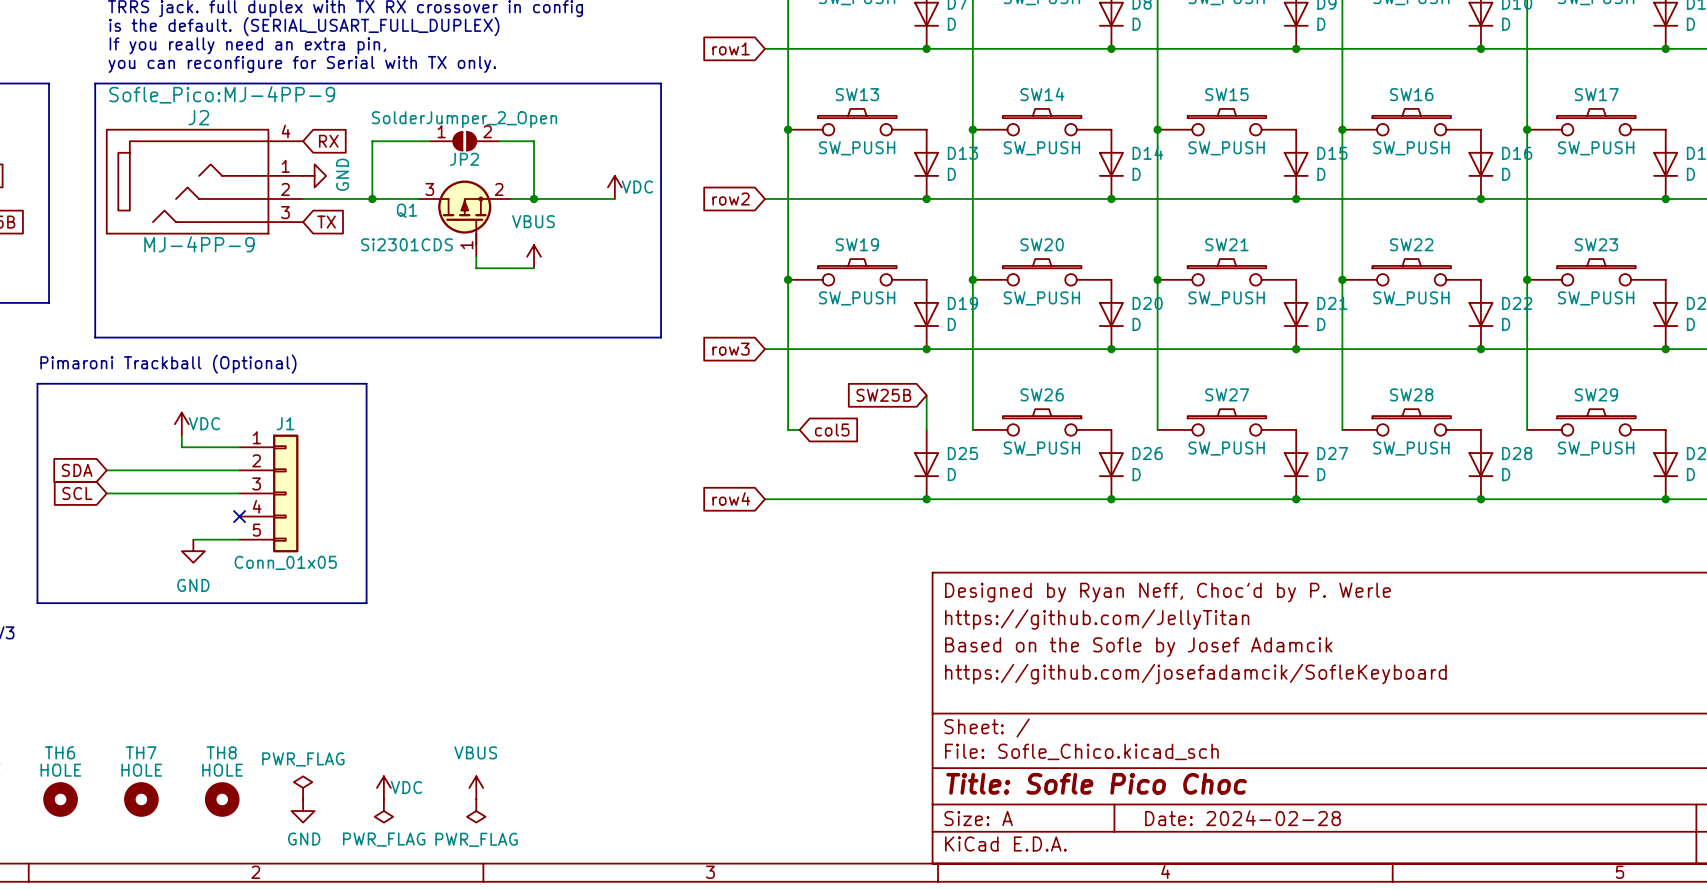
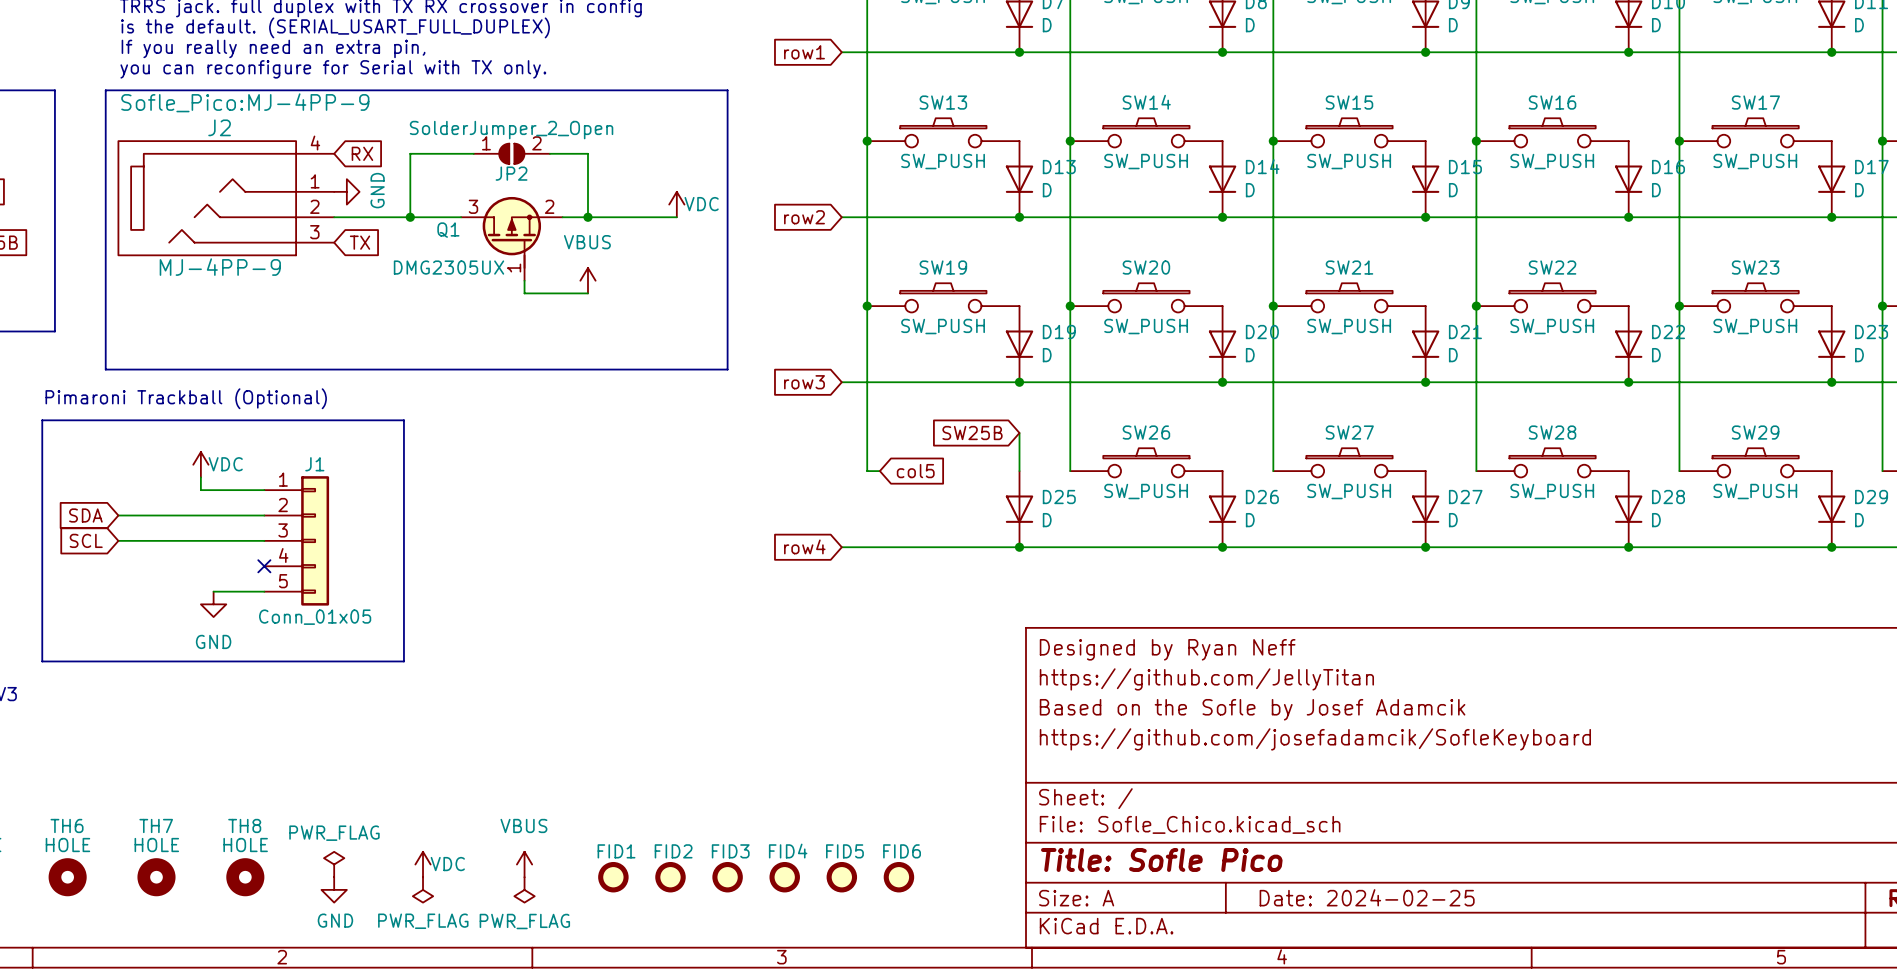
Q1 value: Si2301CDS (407, 244) -> DMG2305UX (448, 267)
title block: Designed by Ryan Neff, Choc'd by P. Werle (1167, 592) -> Designed by Ryan Neff (1167, 649)
title block: Title: Sofle Pico Choc (1096, 783) -> Title: Sofle Pico (1161, 859)
FID1: none -> (613, 877)
FID2: none -> (670, 877)
FID3: none -> (727, 877)
FID4: none -> (784, 877)
FID5: none -> (841, 877)
FID6: none -> (898, 877)
title block: Date: 2024-02-28 (1242, 818) -> Date: 2024-02-25 (1367, 897)

